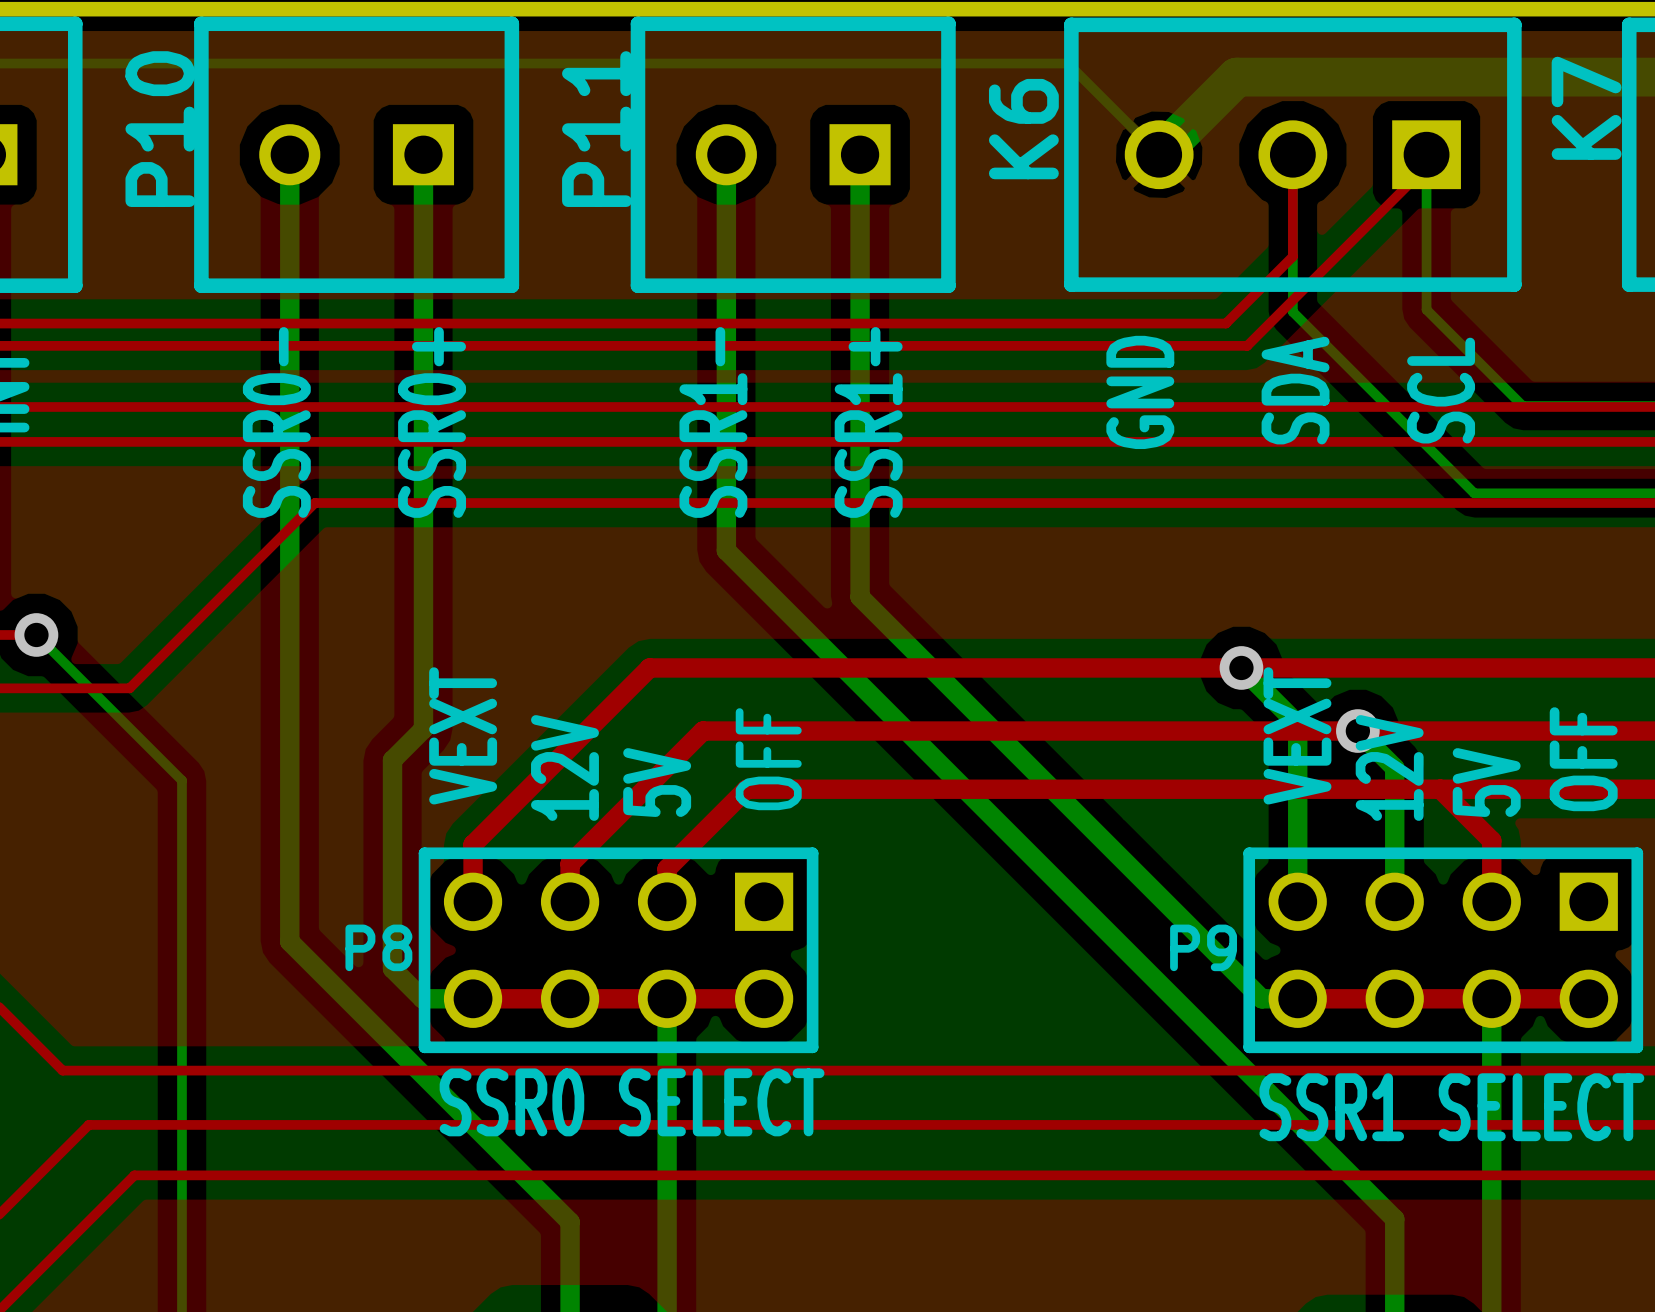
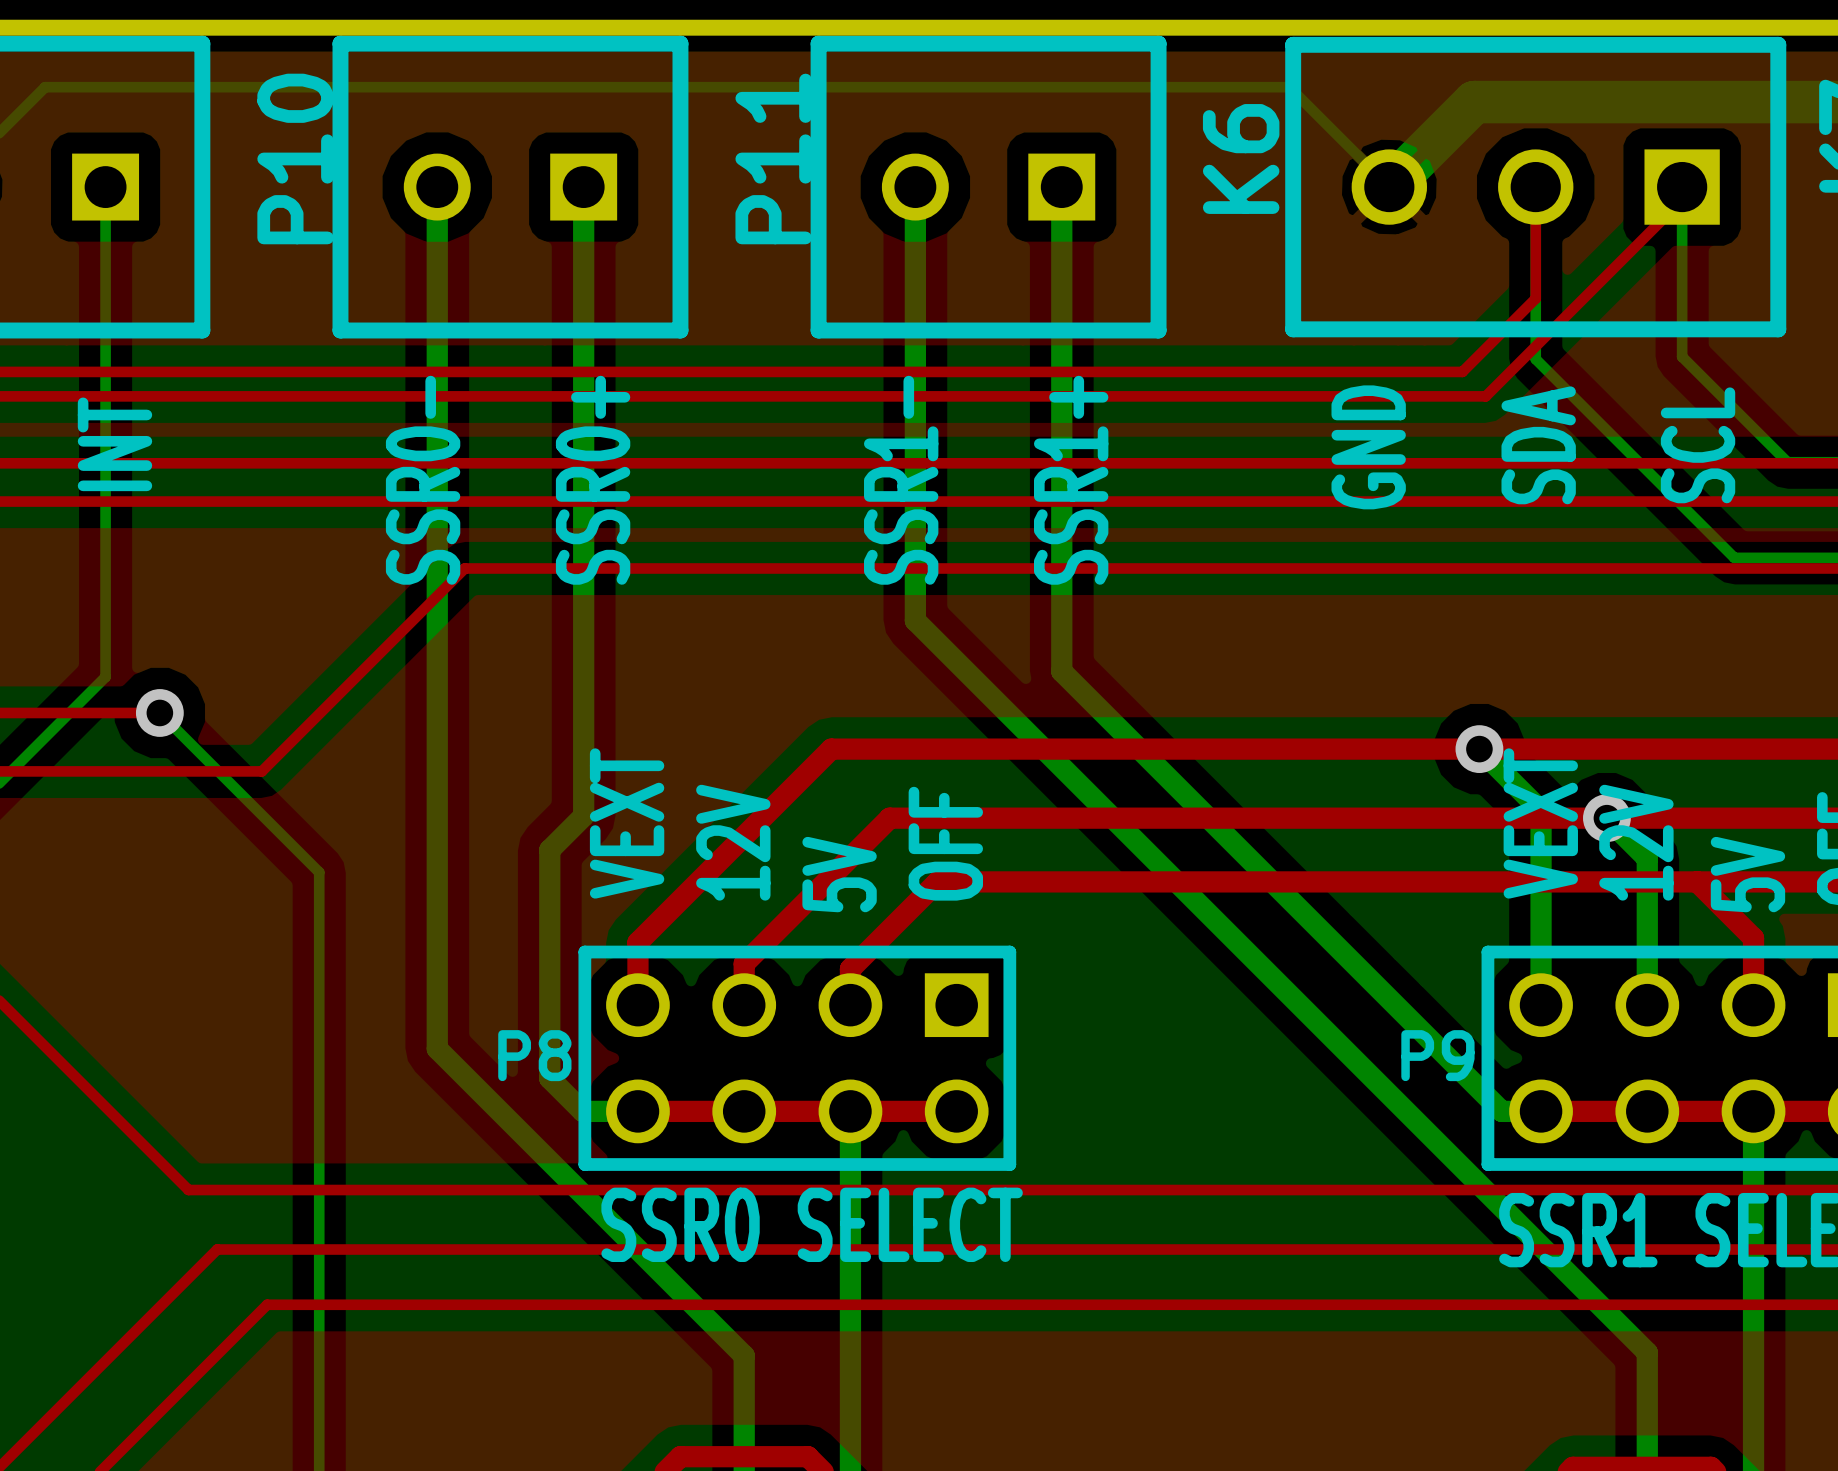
text position: OFF (768, 759) -> OFF (945, 843)
text position: 12V (564, 767) -> 12V (733, 842)
text position: 12V (1389, 767) -> 12V (1636, 842)

